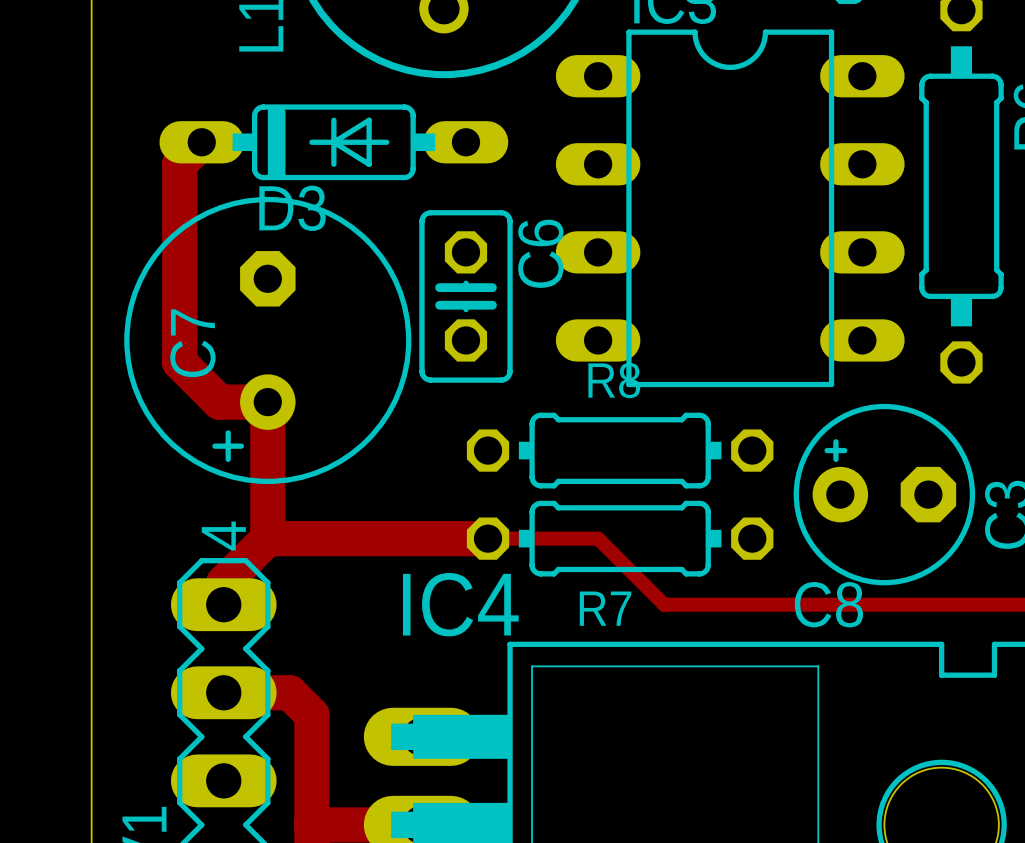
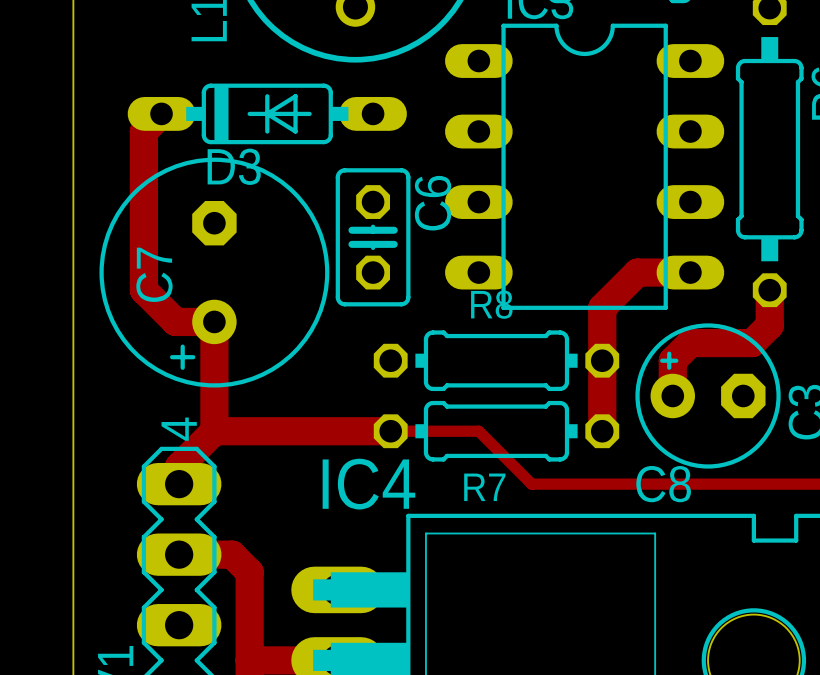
track: none -> (690, 272) (637, 272) (602, 307) (602, 431)
track: none -> (769, 290) (769, 325) (752, 343) (690, 343) (672, 360) (672, 395)

